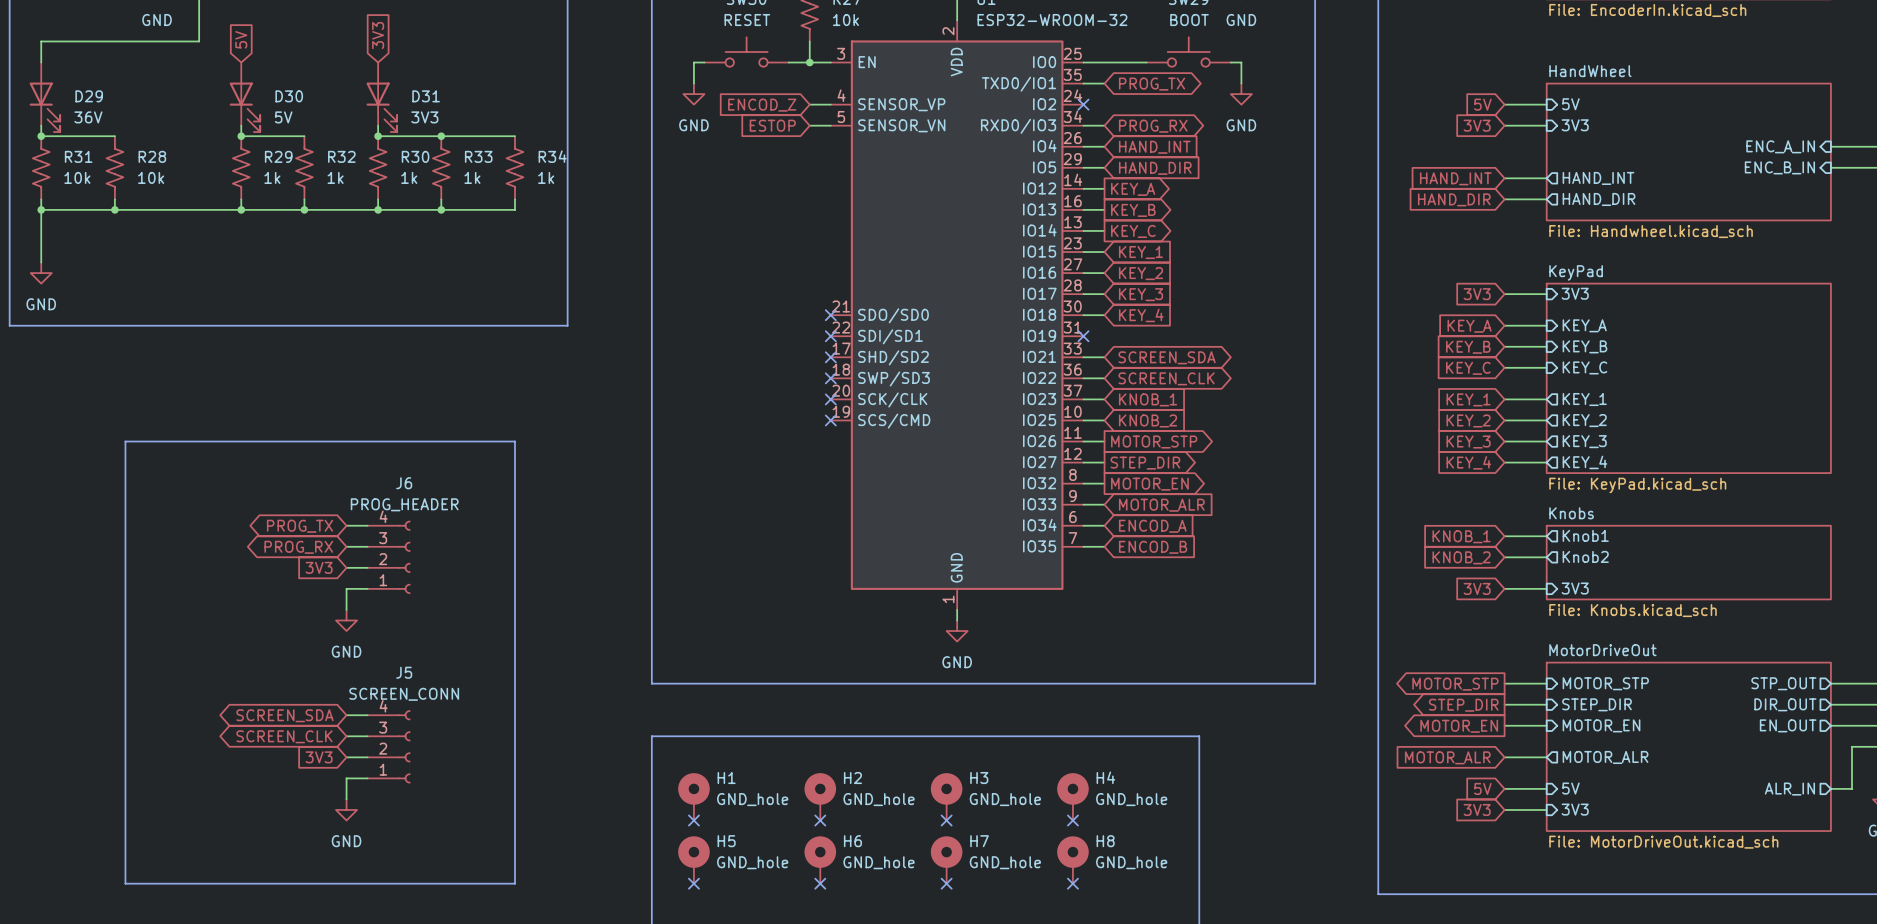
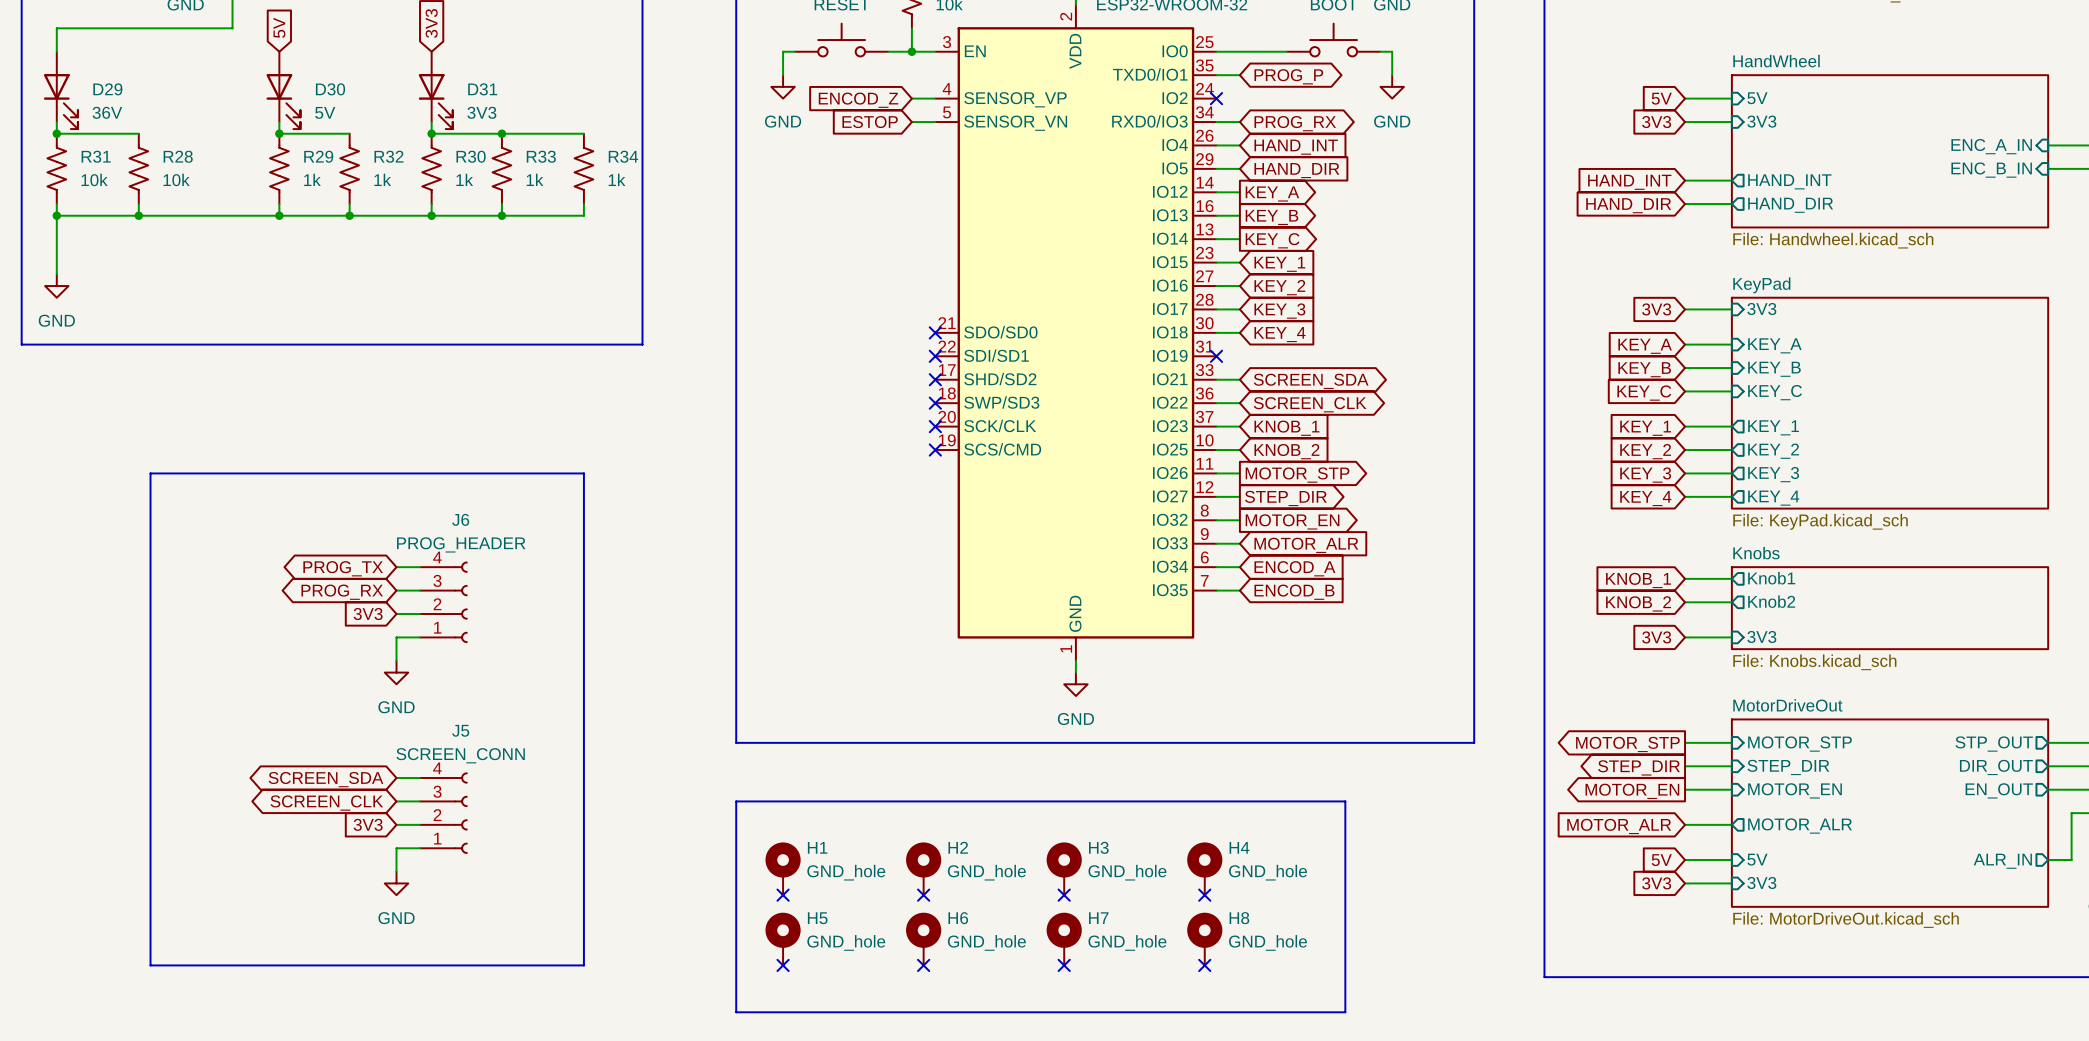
global label: PROG_TX (1152, 84) -> PROG_P (1288, 76)

